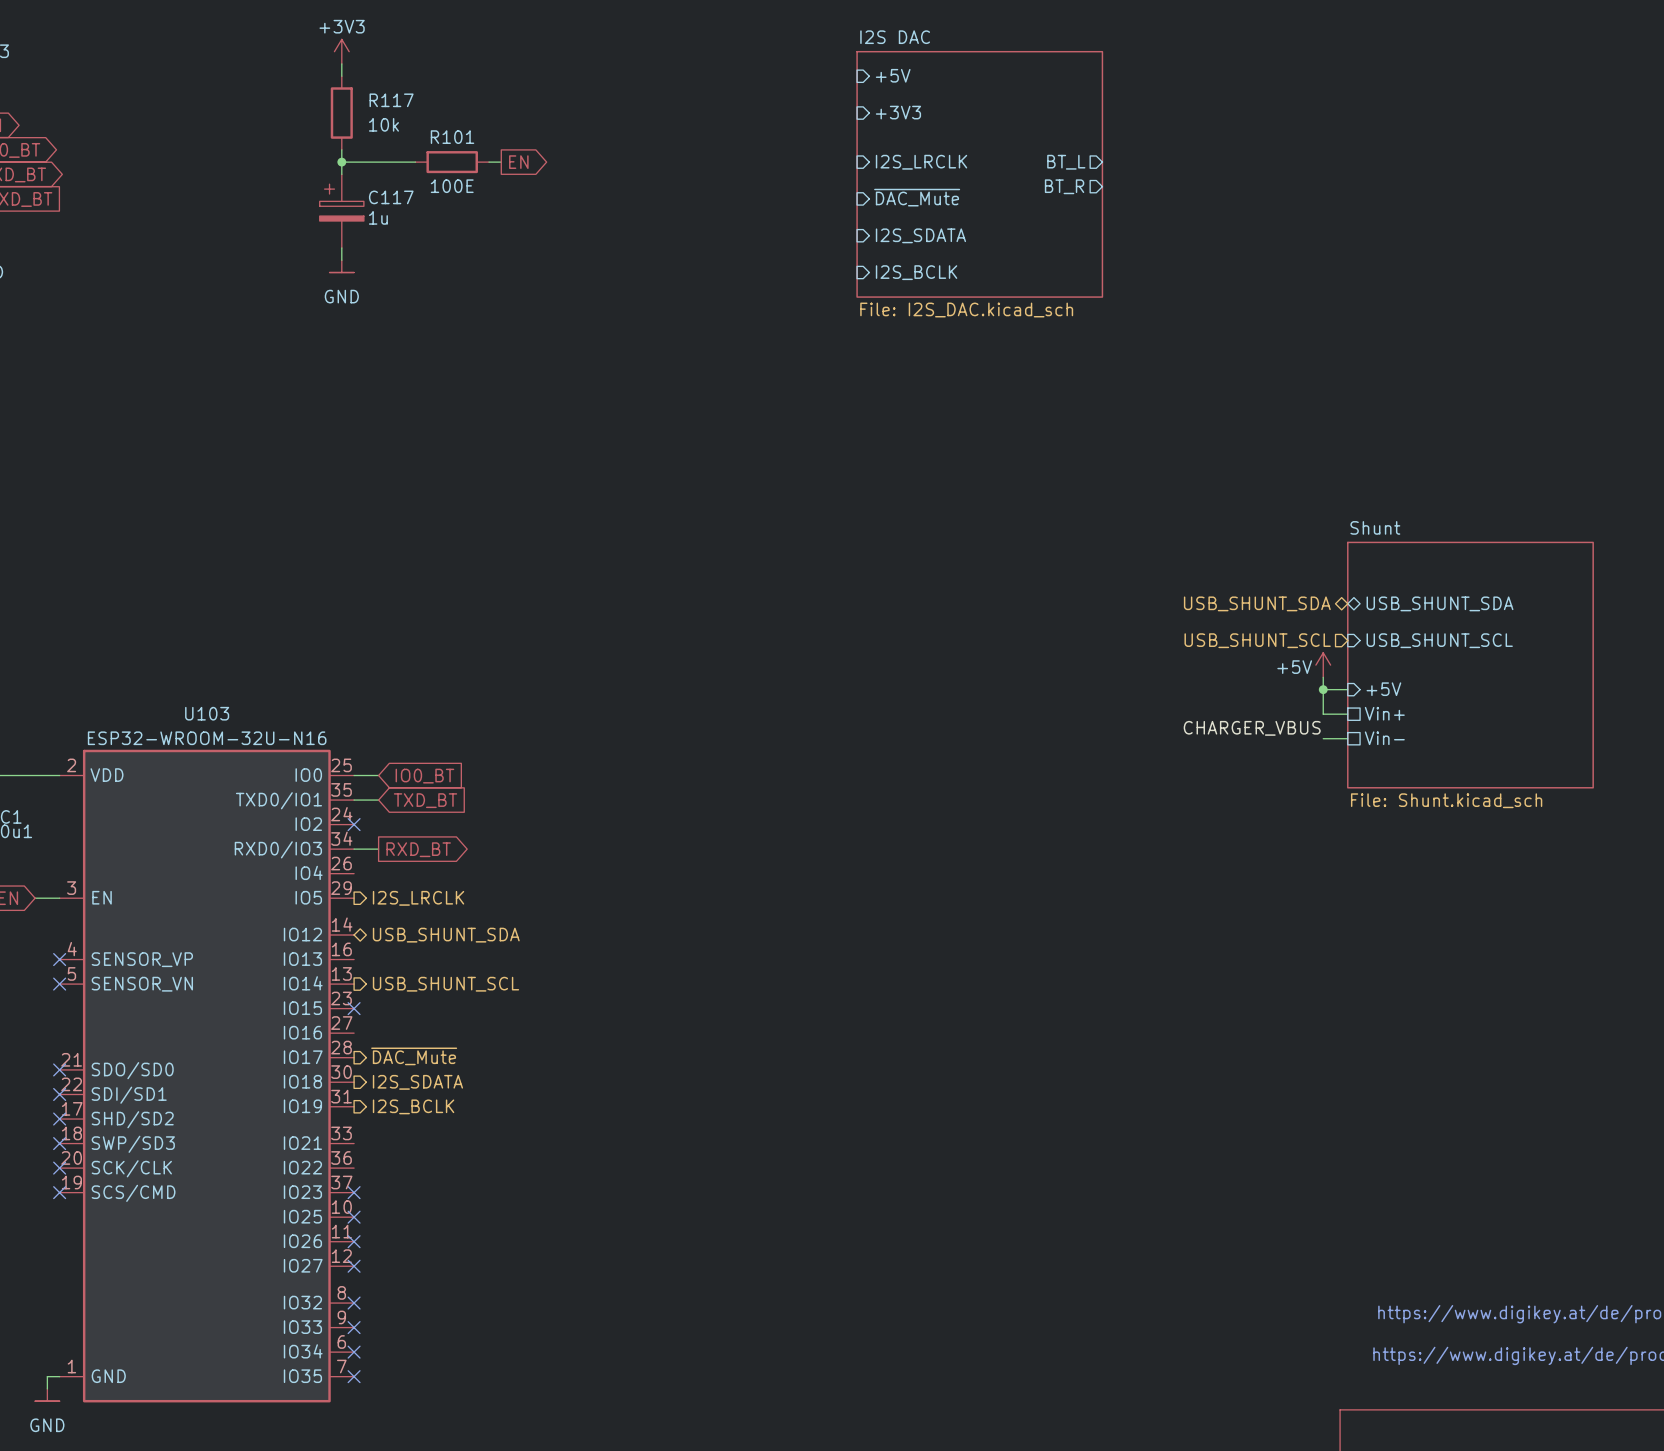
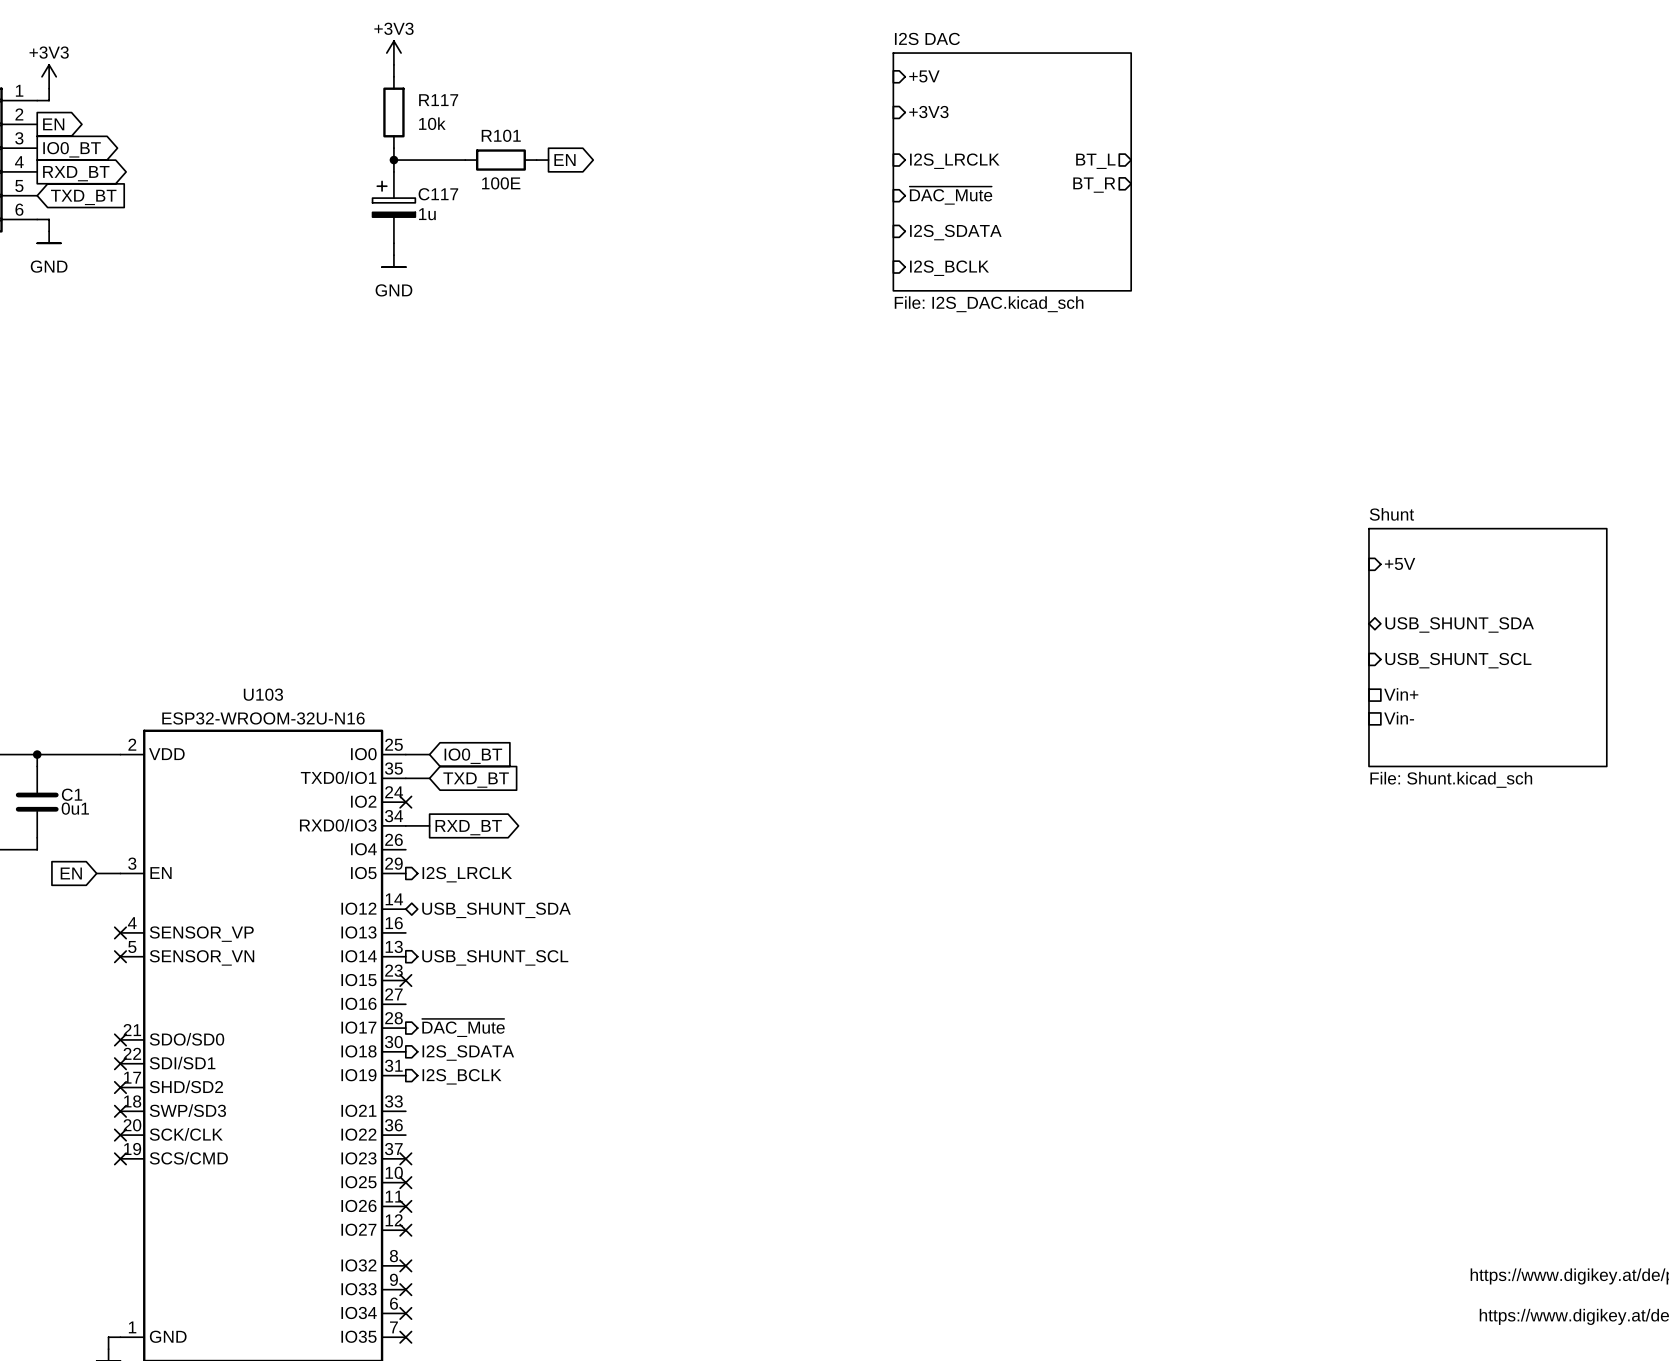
hierarchical label: USB_SHUNT_SDA (1257, 603) -> none
sheet pin: USB_SHUNT_SDA (1440, 603) -> none
hierarchical label: USB_SHUNT_SCL (1257, 640) -> none
sheet pin shape: input (1439, 640) -> bidirectional (1459, 624)
sheet pin: USB_SHUNT_SCL (1439, 640) -> USB_SHUNT_SDA (1459, 624)
power symbol: +5V (1323, 665) -> none
wire: (1323, 677) (1323, 714) (1347, 714) -> none
sheet pin: none -> USB_SHUNT_SCL (1458, 660)
wire: (1323, 689) (1347, 689) -> none
junction: (1323, 689) -> none
sheet pin position: +5V (1383, 689) -> +5V (1400, 563)
label: CHARGER_VBUS (1252, 728) -> none
wire: (1323, 738) (1347, 738) -> none

